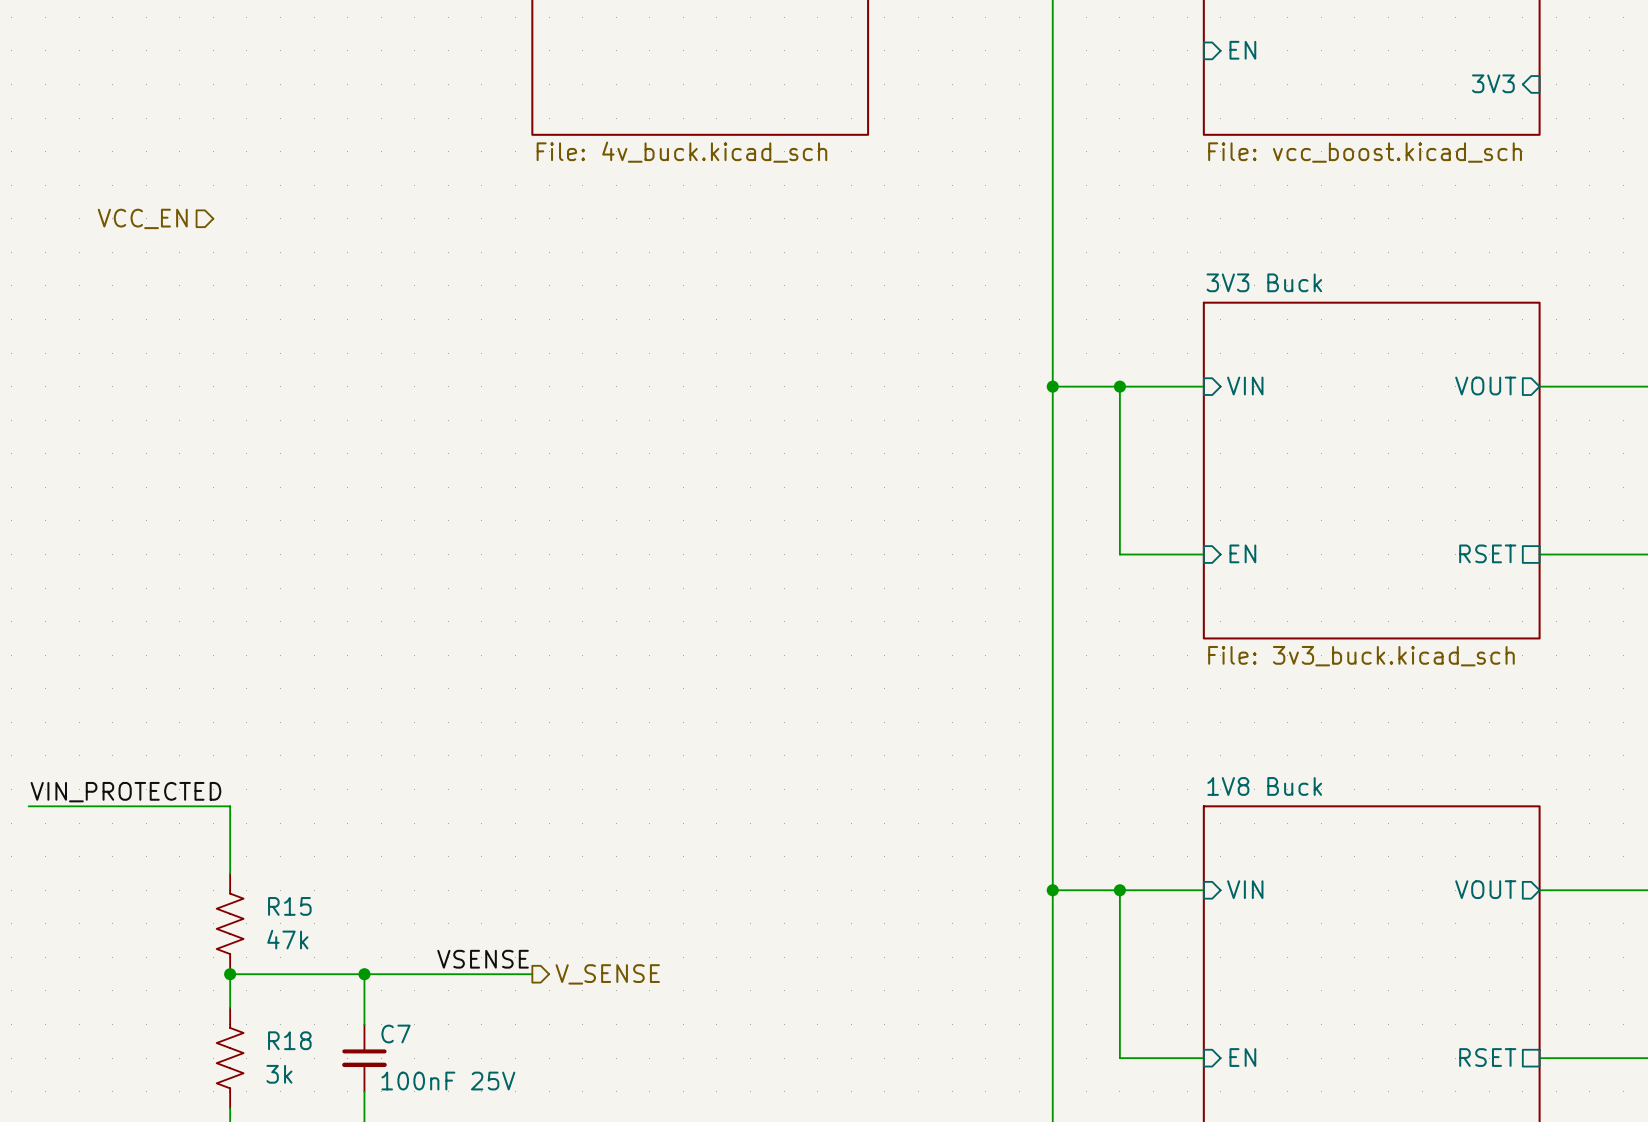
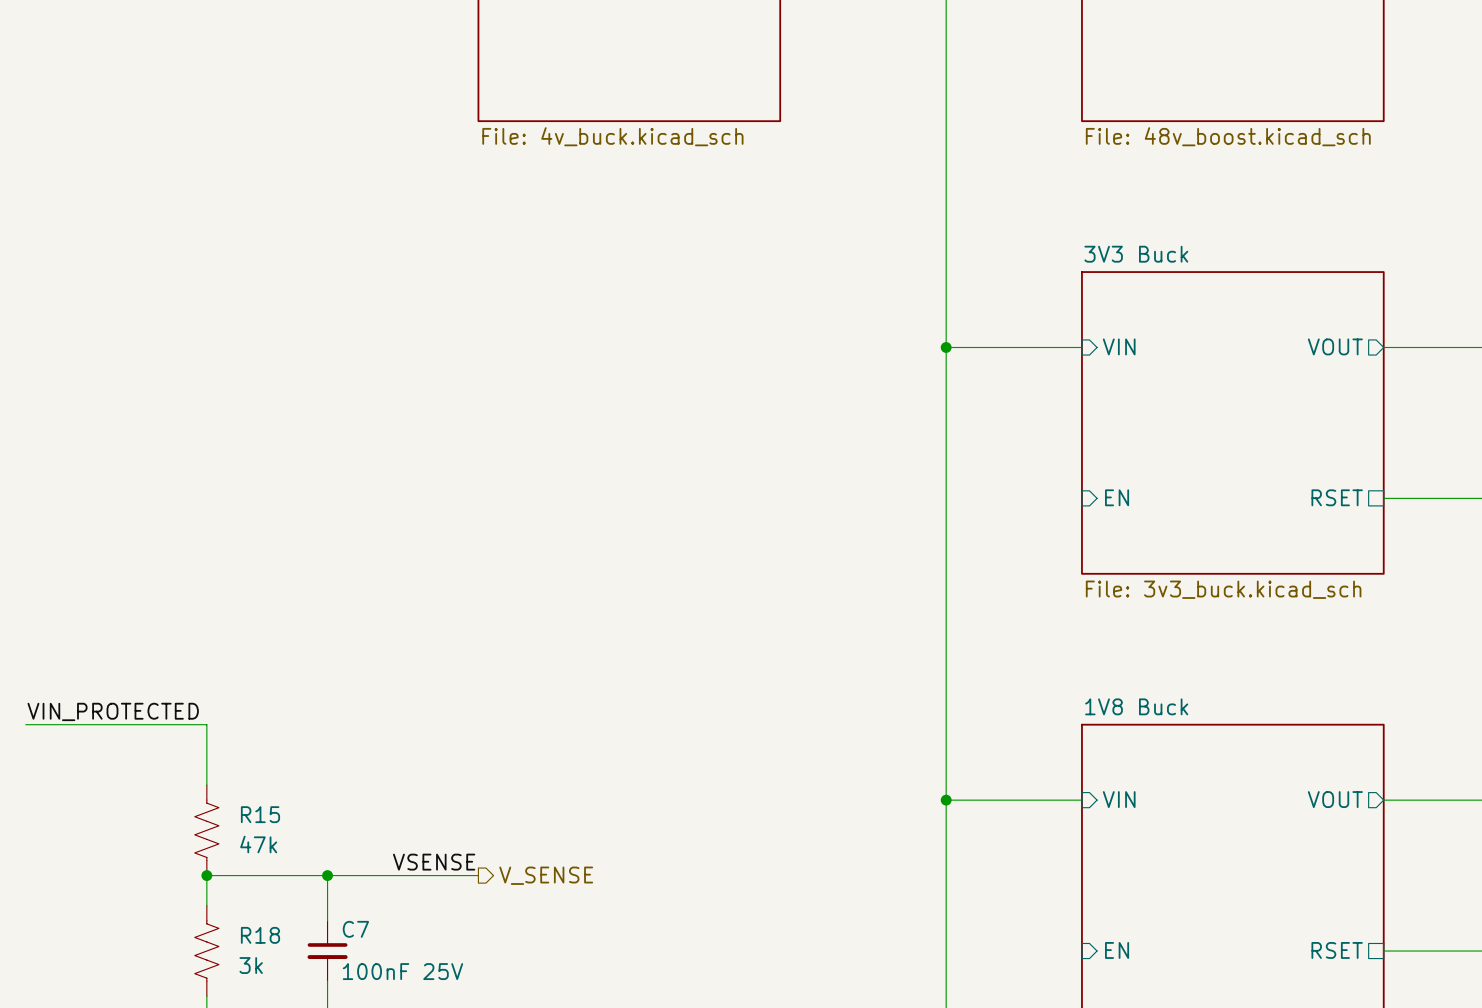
sheet pin: EN (1242, 50) -> none
sheet pin: 3V3 (1493, 83) -> none
sheet value: File: vcc_boost.kicad_sch (1365, 152) -> File: 48v_boost.kicad_sch (1228, 136)
hierarchical label: VCC_EN (142, 218) -> none
wire: (1119, 386) (1119, 554) (1203, 554) -> none
junction: (1119, 386) -> none
wire: (1119, 890) (1119, 1058) (1203, 1058) -> none
junction: (1119, 890) -> none

